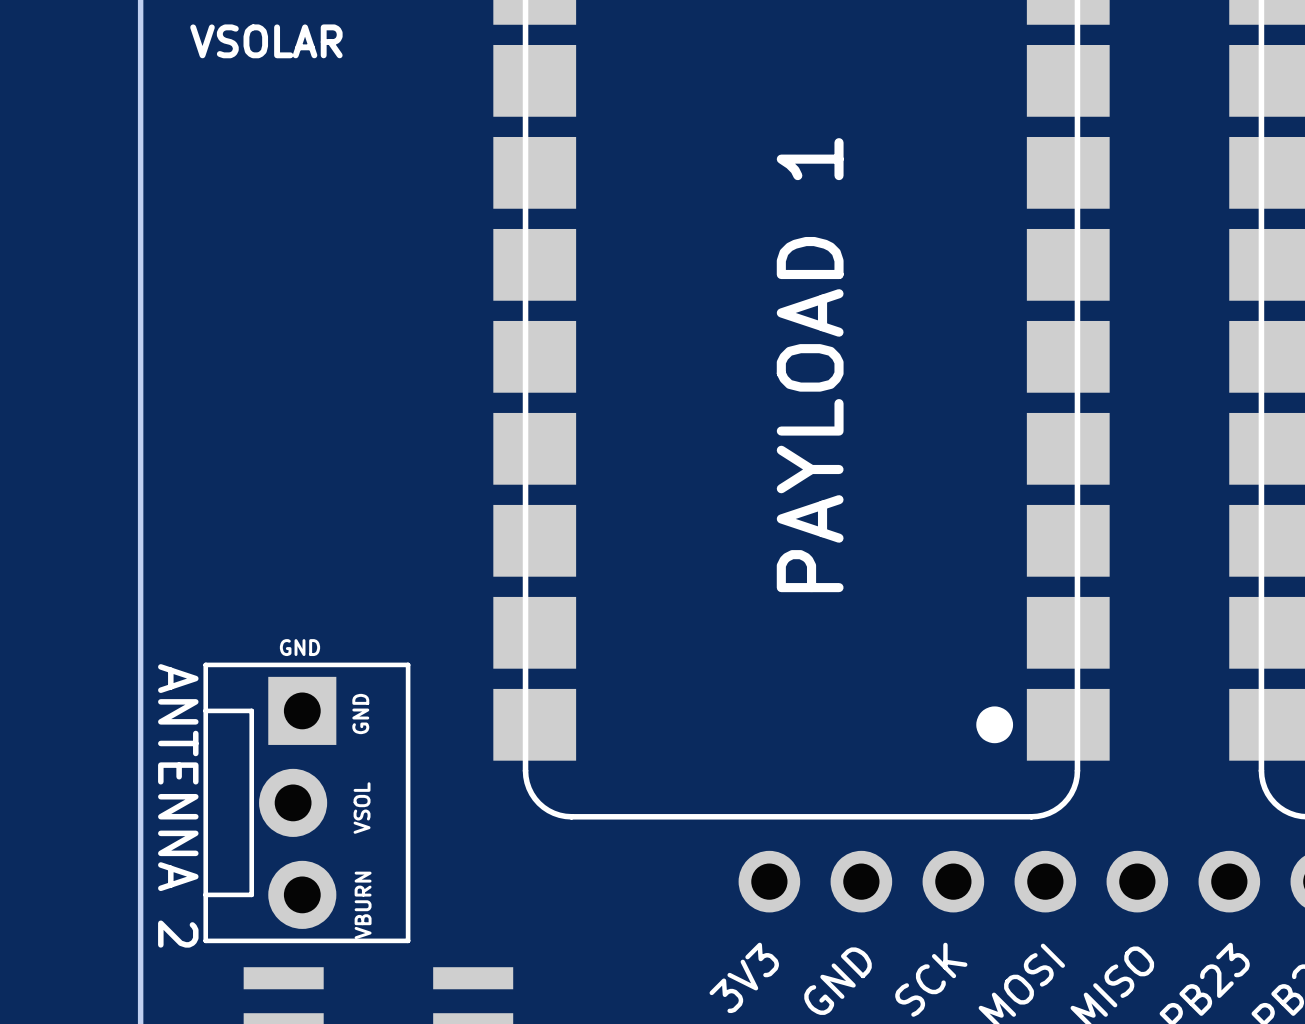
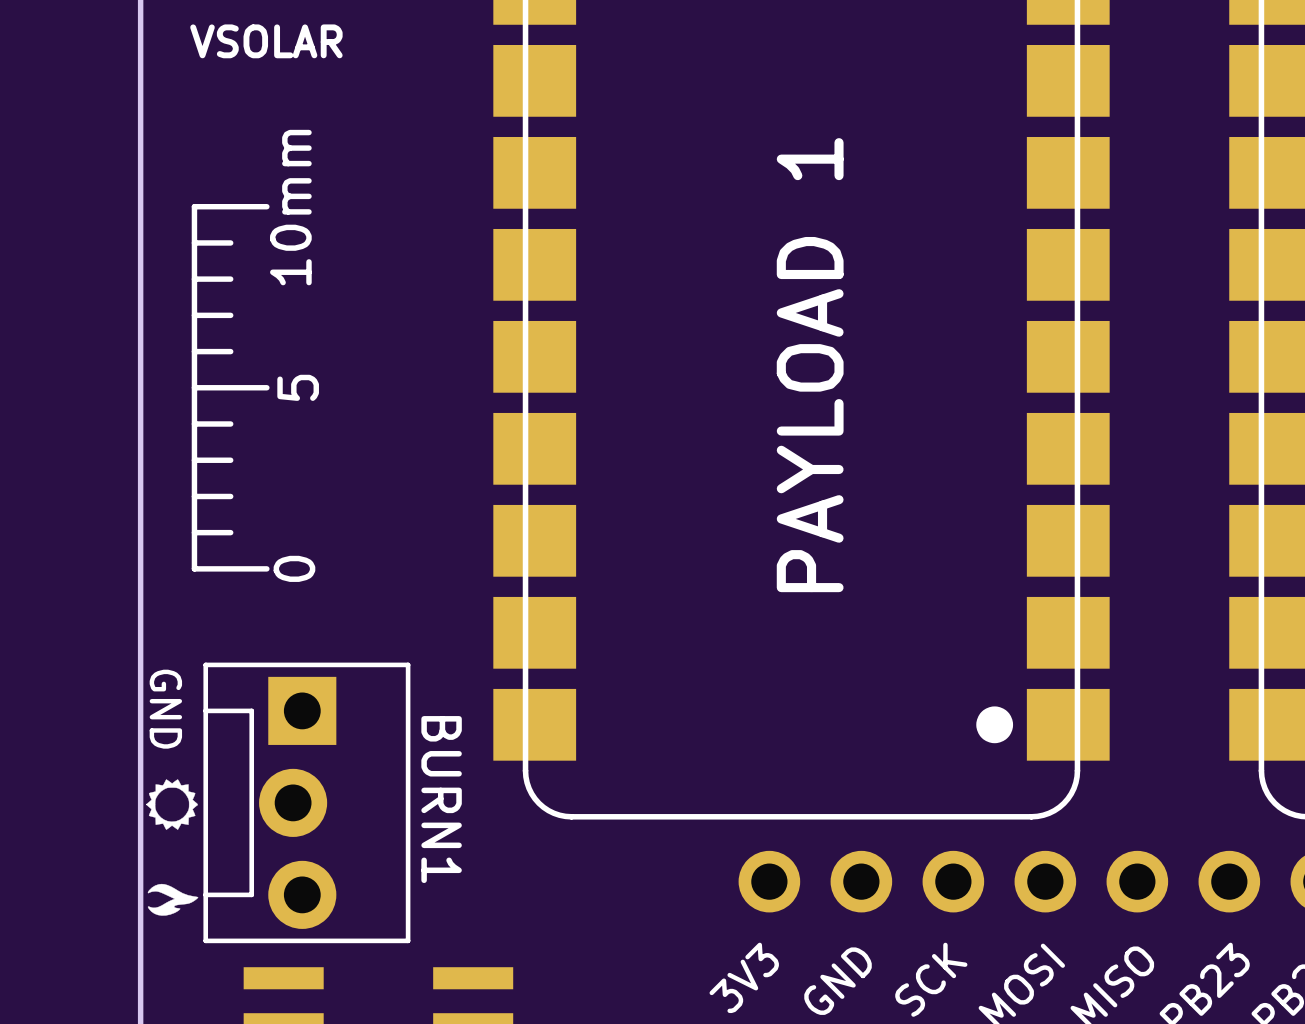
drawing: none -> [191, 204, 270, 572]
text: GND (299, 647) -> none
text: none -> GND (165, 709)
text: GND (360, 714) -> none
drawing: none -> [145, 779, 198, 830]
text: none -> BURN1 (441, 799)
text: ANTENNA 2 (178, 805) -> none
text: VSOL (362, 808) -> none
drawing: none -> [147, 883, 199, 916]
text: VBURN (363, 905) -> none

